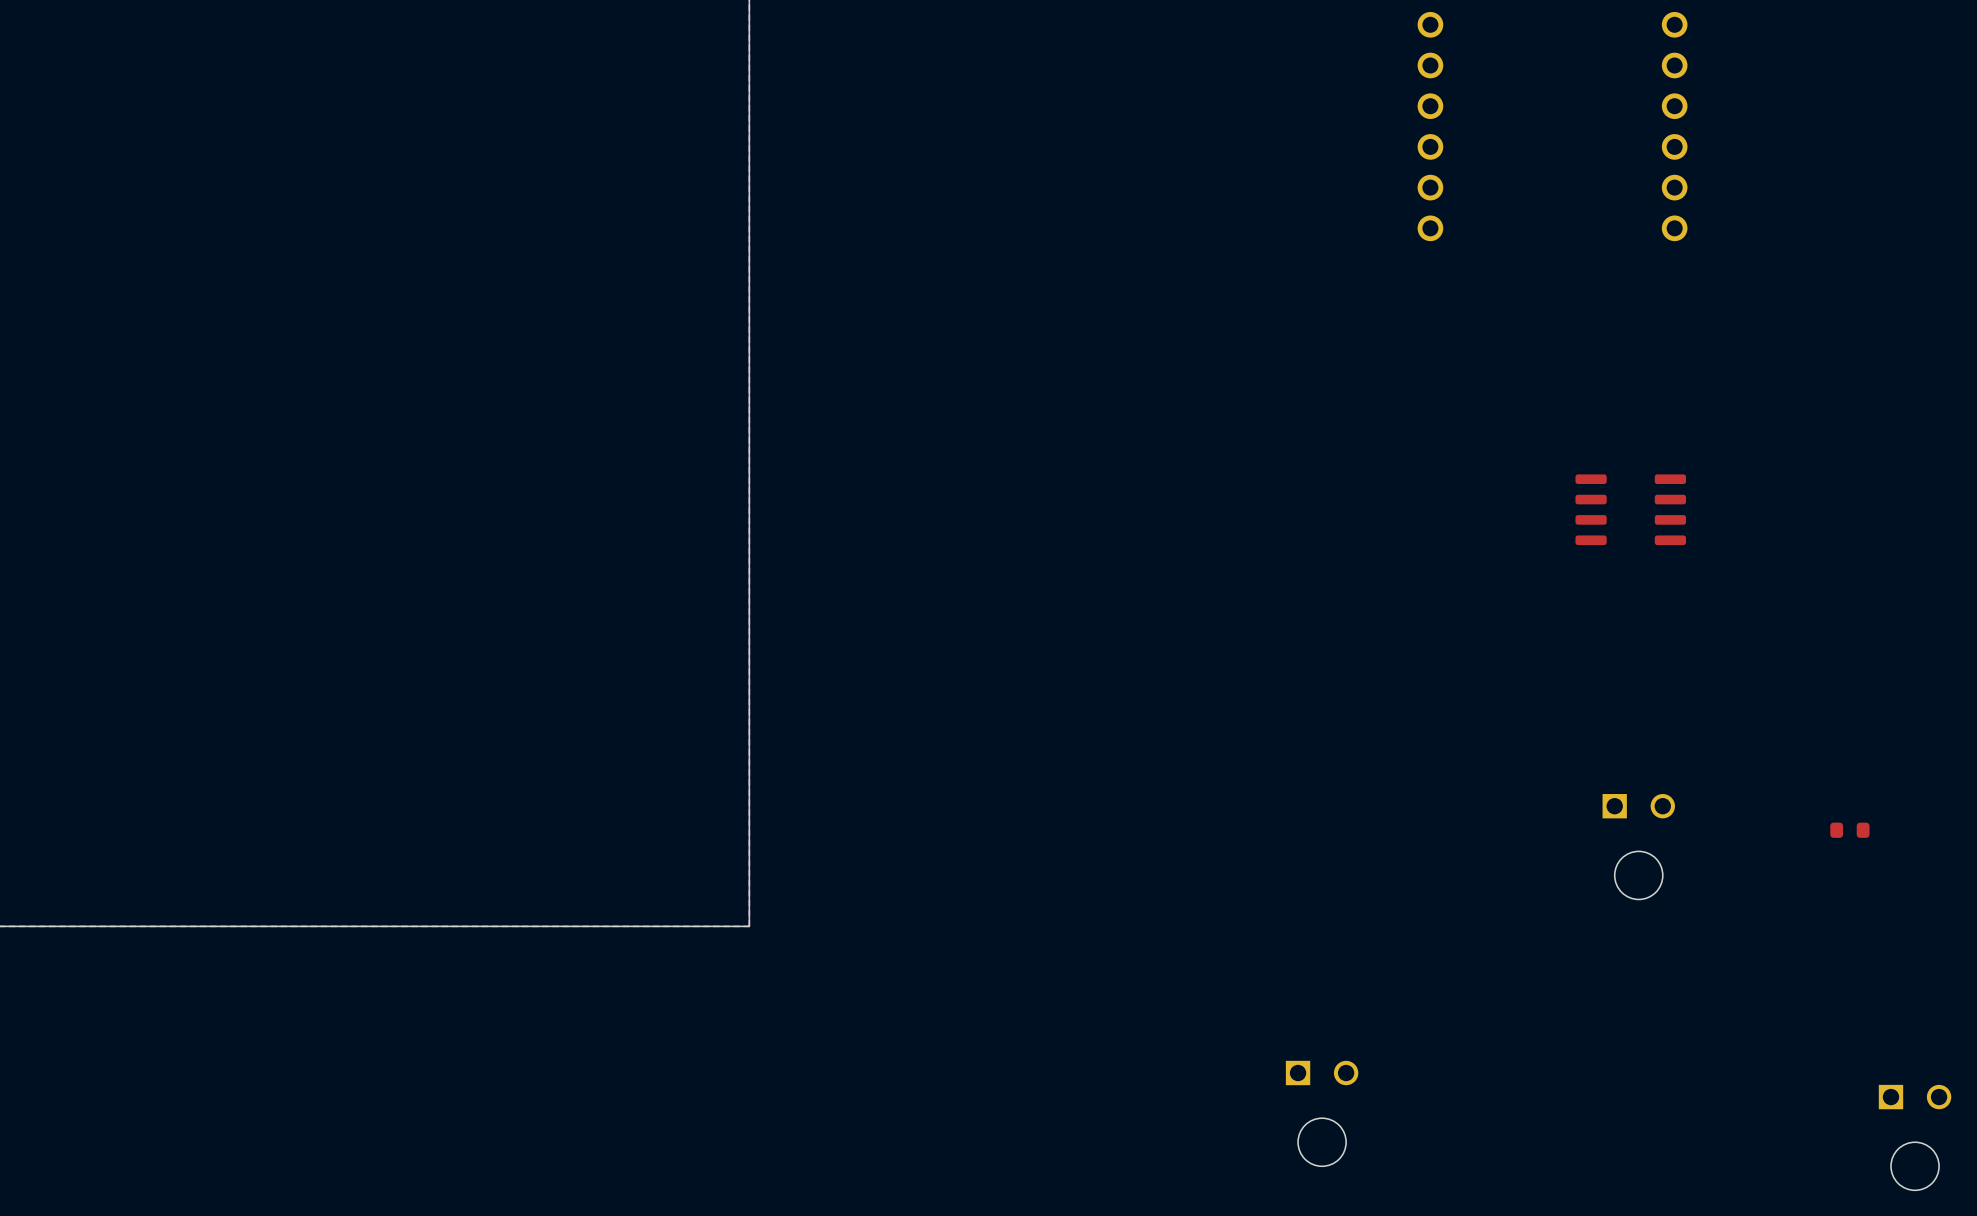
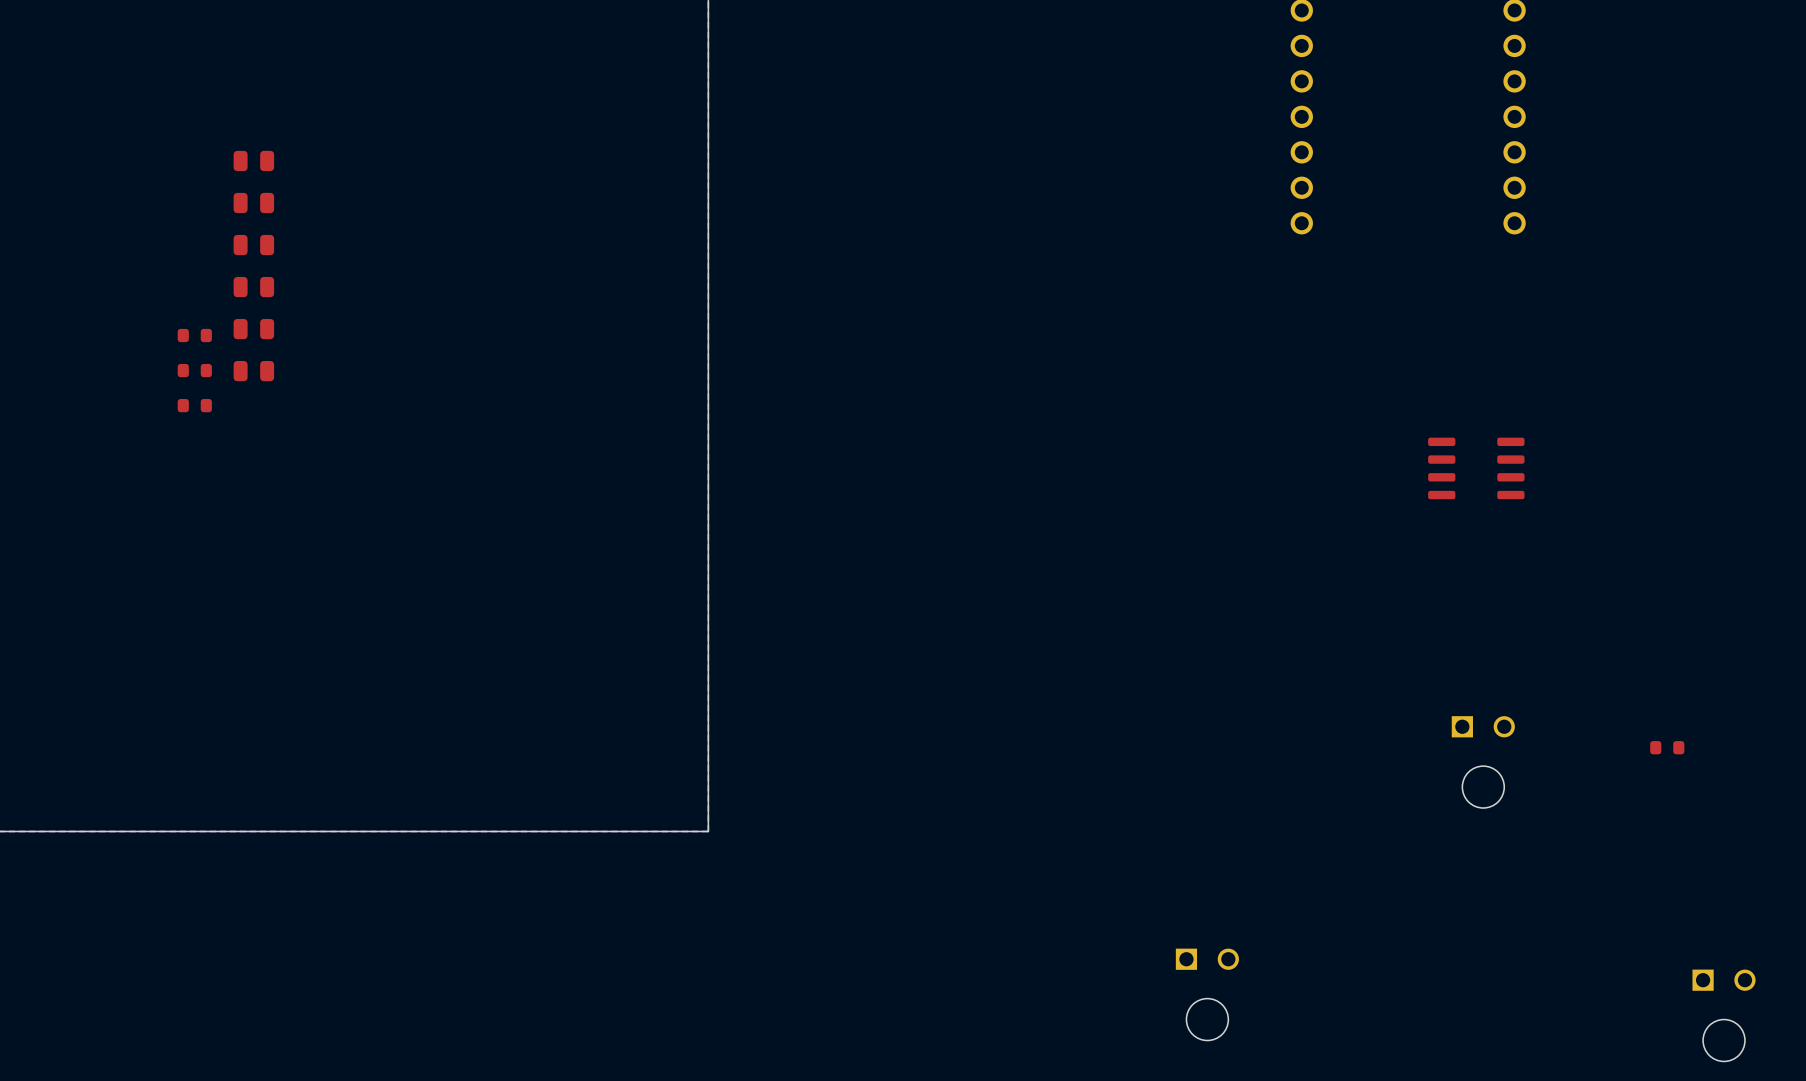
part: none -> (253, 160)
part: none -> (253, 203)
part: none -> (253, 245)
part: none -> (253, 287)
part: none -> (253, 329)
part: none -> (194, 335)
part: none -> (194, 370)
part: none -> (253, 371)
part: none -> (194, 405)

